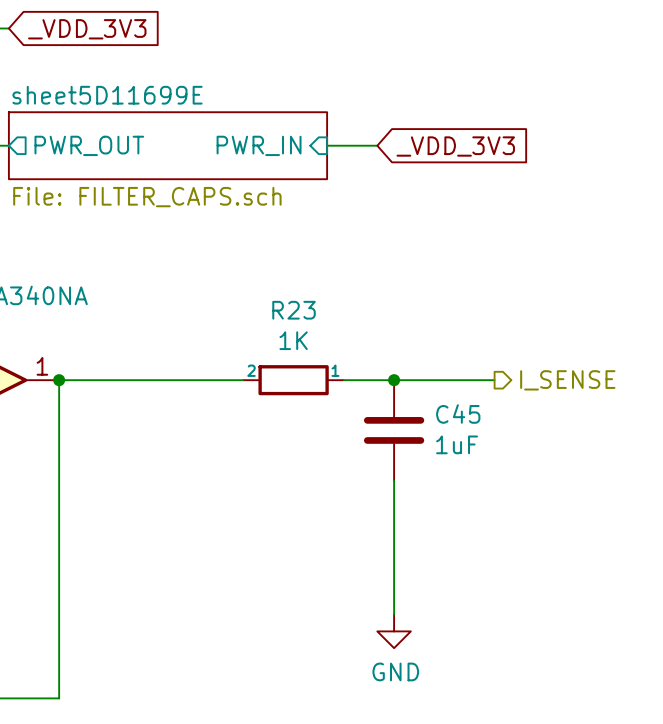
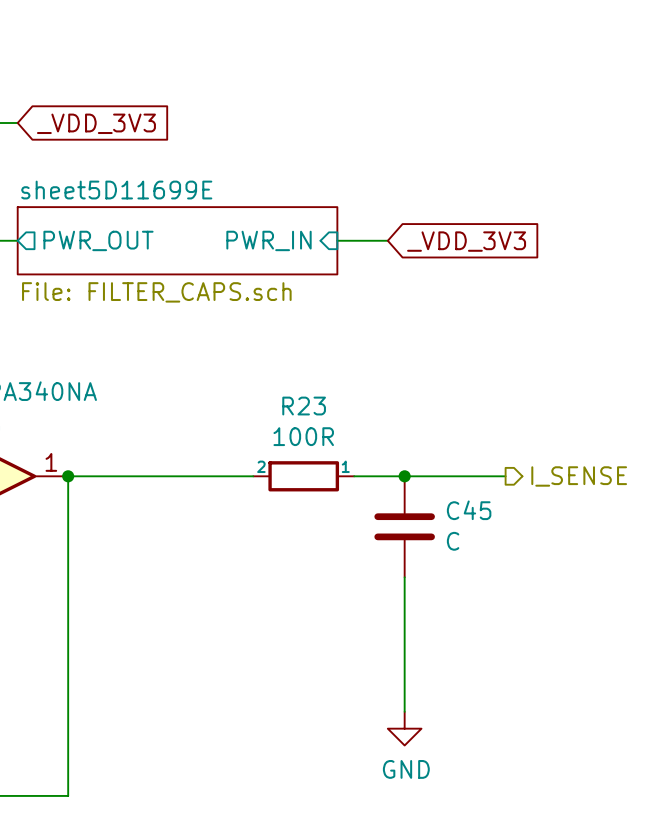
R23 value: 1K (293, 340) -> 100R (303, 436)
C45 value: 1uF (457, 444) -> C (453, 541)

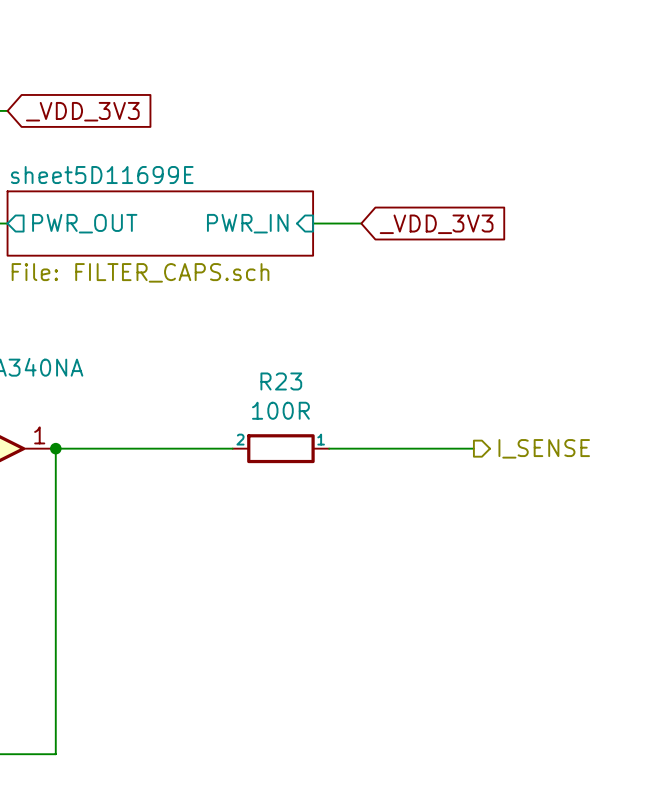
junction: (404, 476) -> none
C45: C (404, 526) -> none
wire: (404, 577) (404, 711) -> none
power symbol: GND (404, 728) -> none

